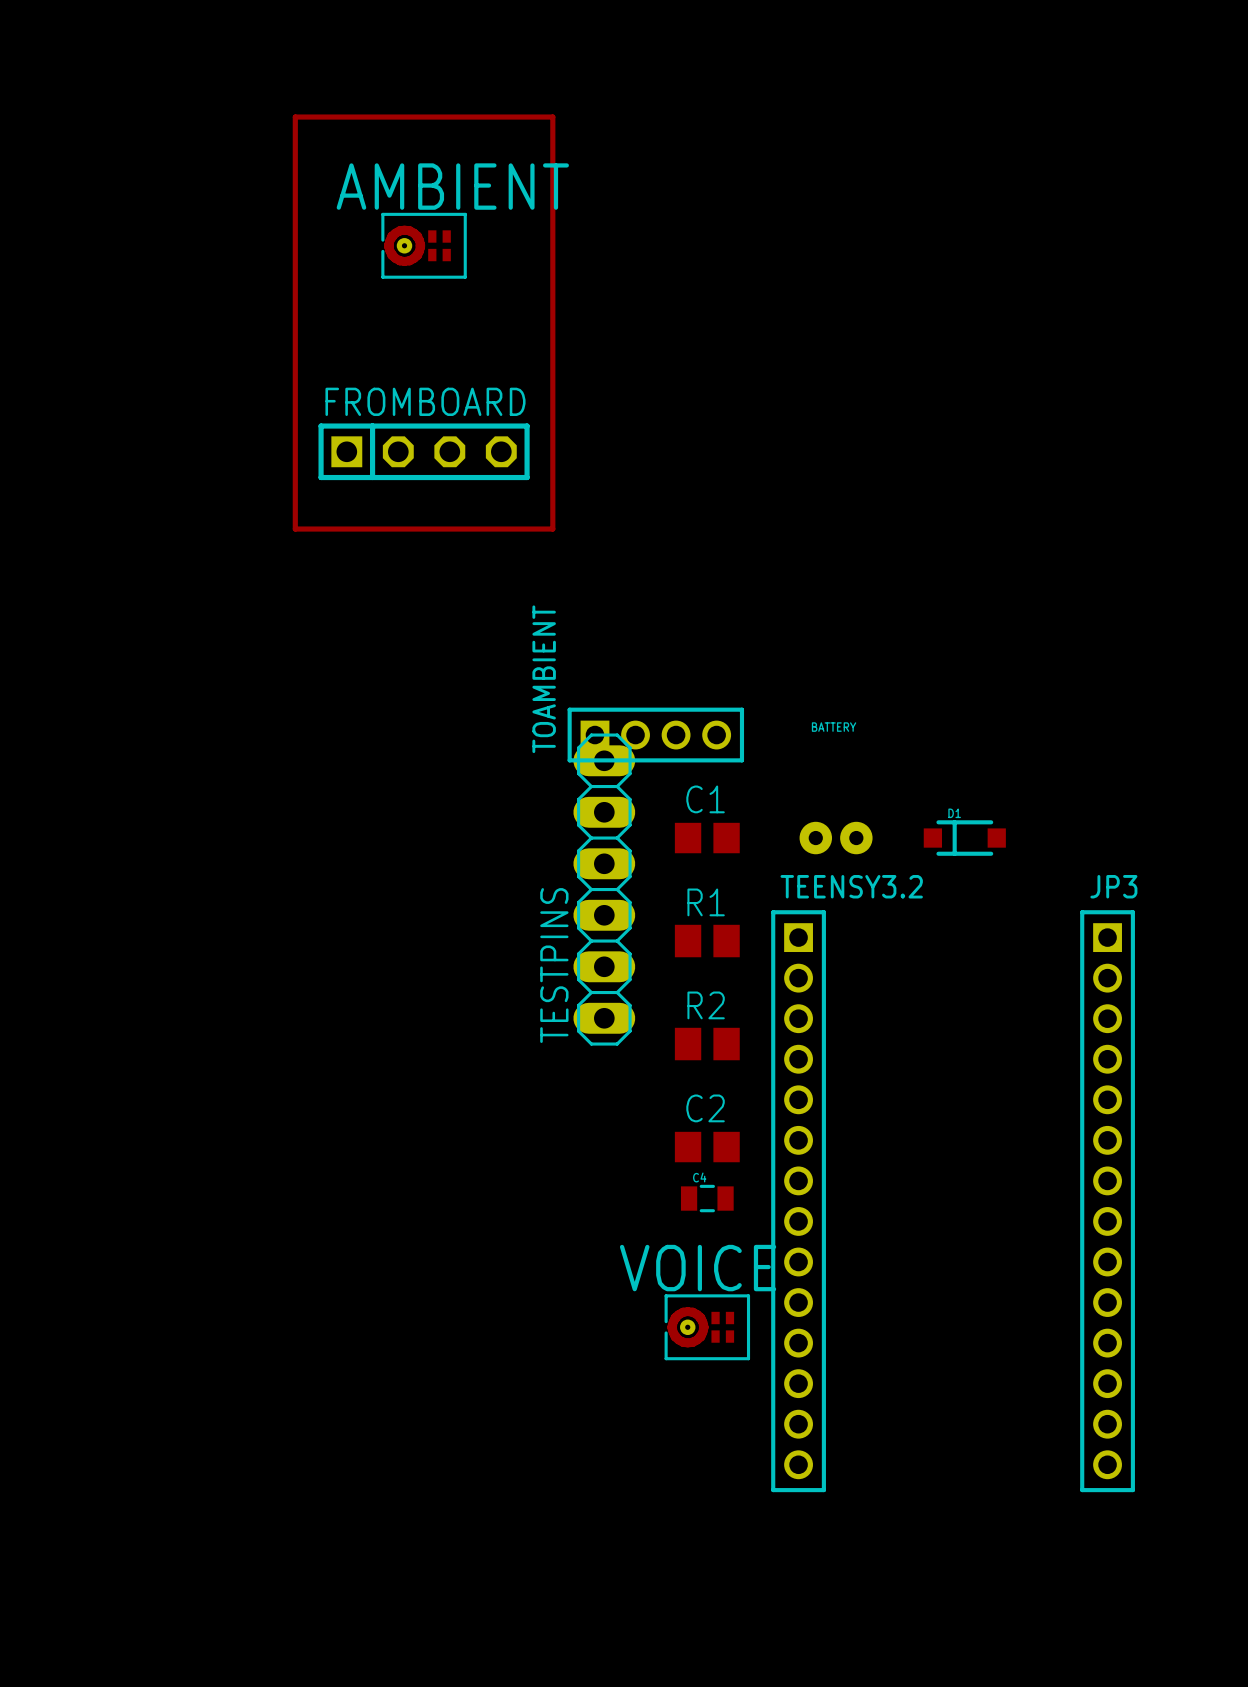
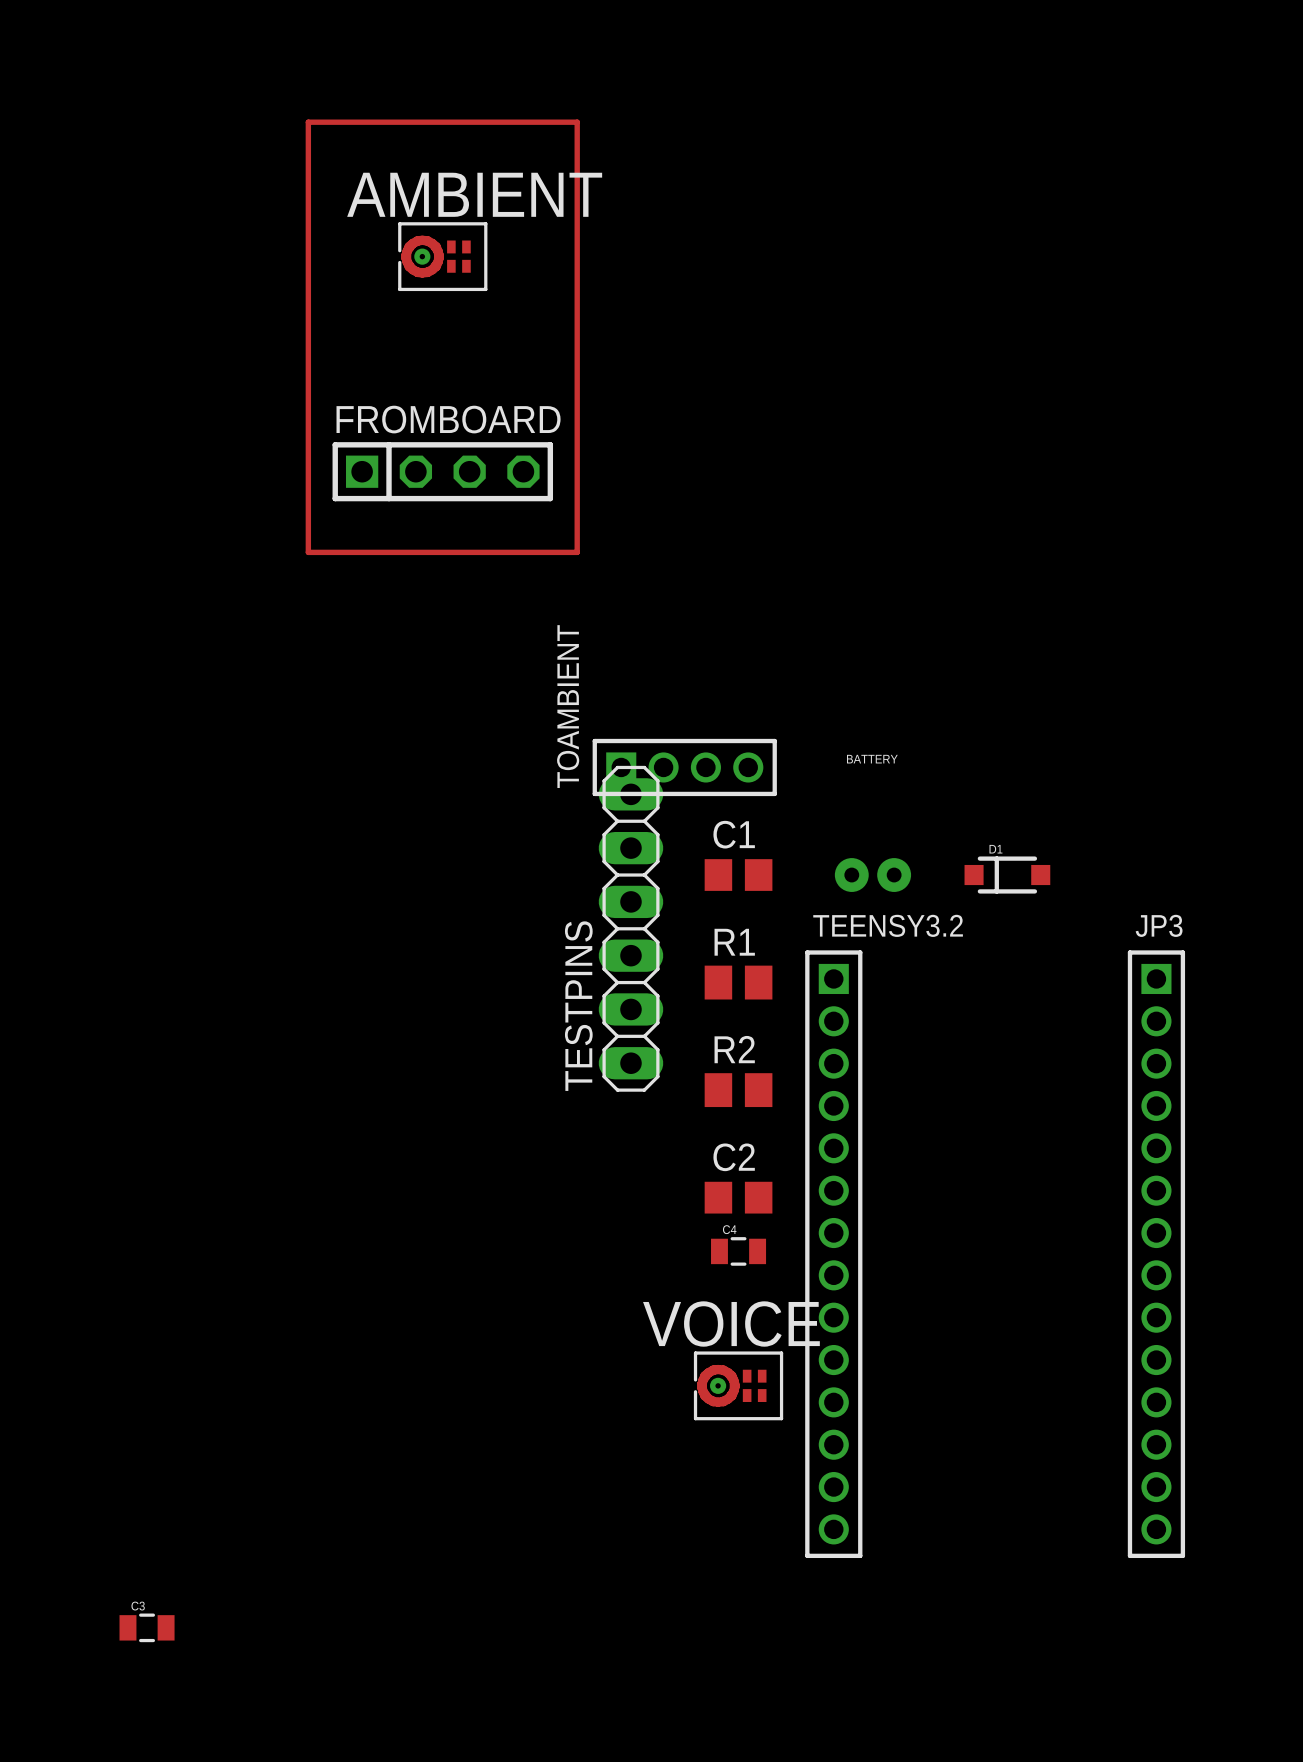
C3: none -> (147, 1627)

